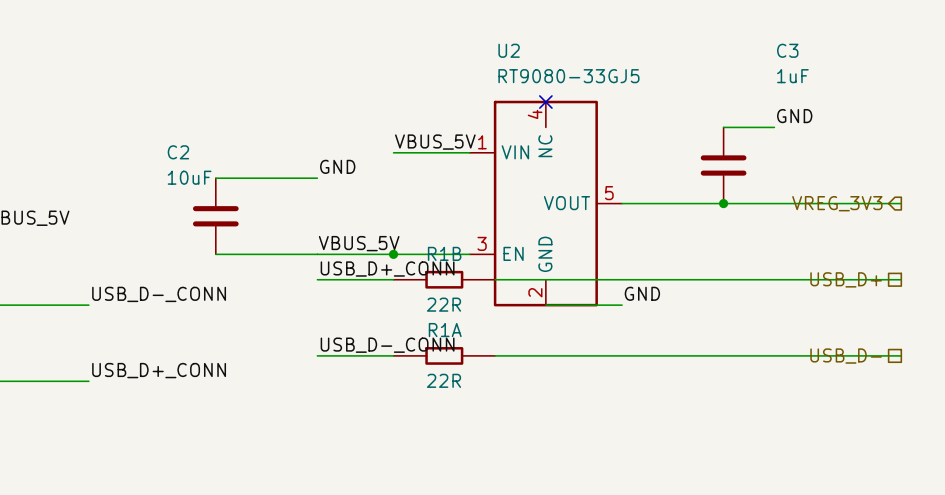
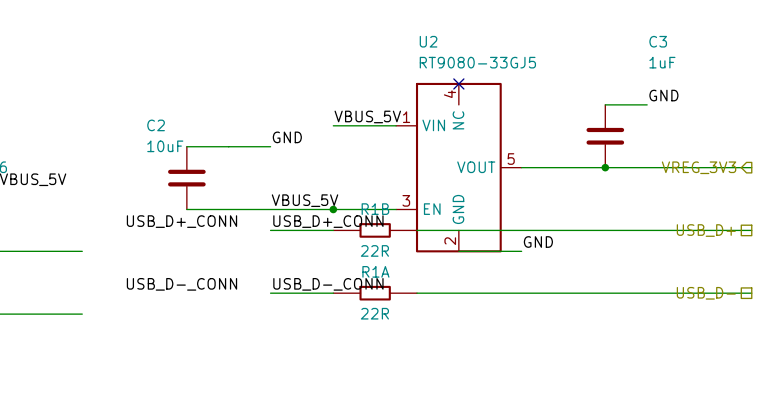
label position: USB_D-_CONN (159, 294) -> USB_D-_CONN (181, 284)
label position: USB_D+_CONN (159, 370) -> USB_D+_CONN (181, 221)

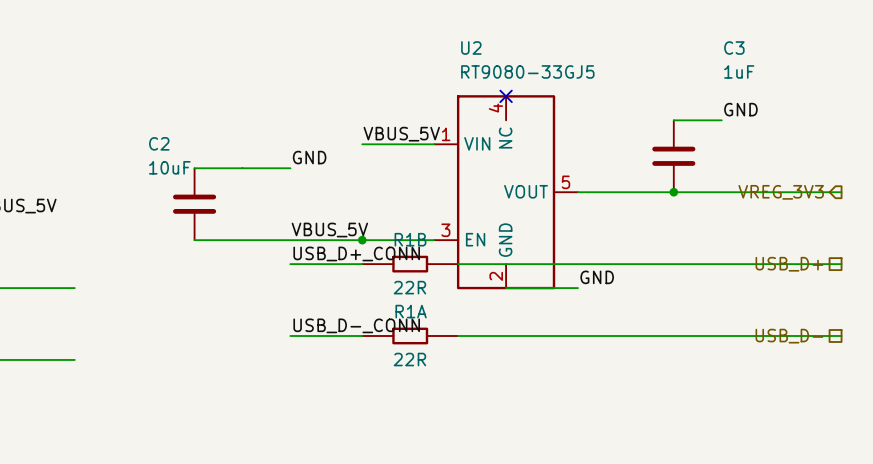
label: USB_D+_CONN (181, 221) -> none
label: USB_D-_CONN (181, 284) -> none

